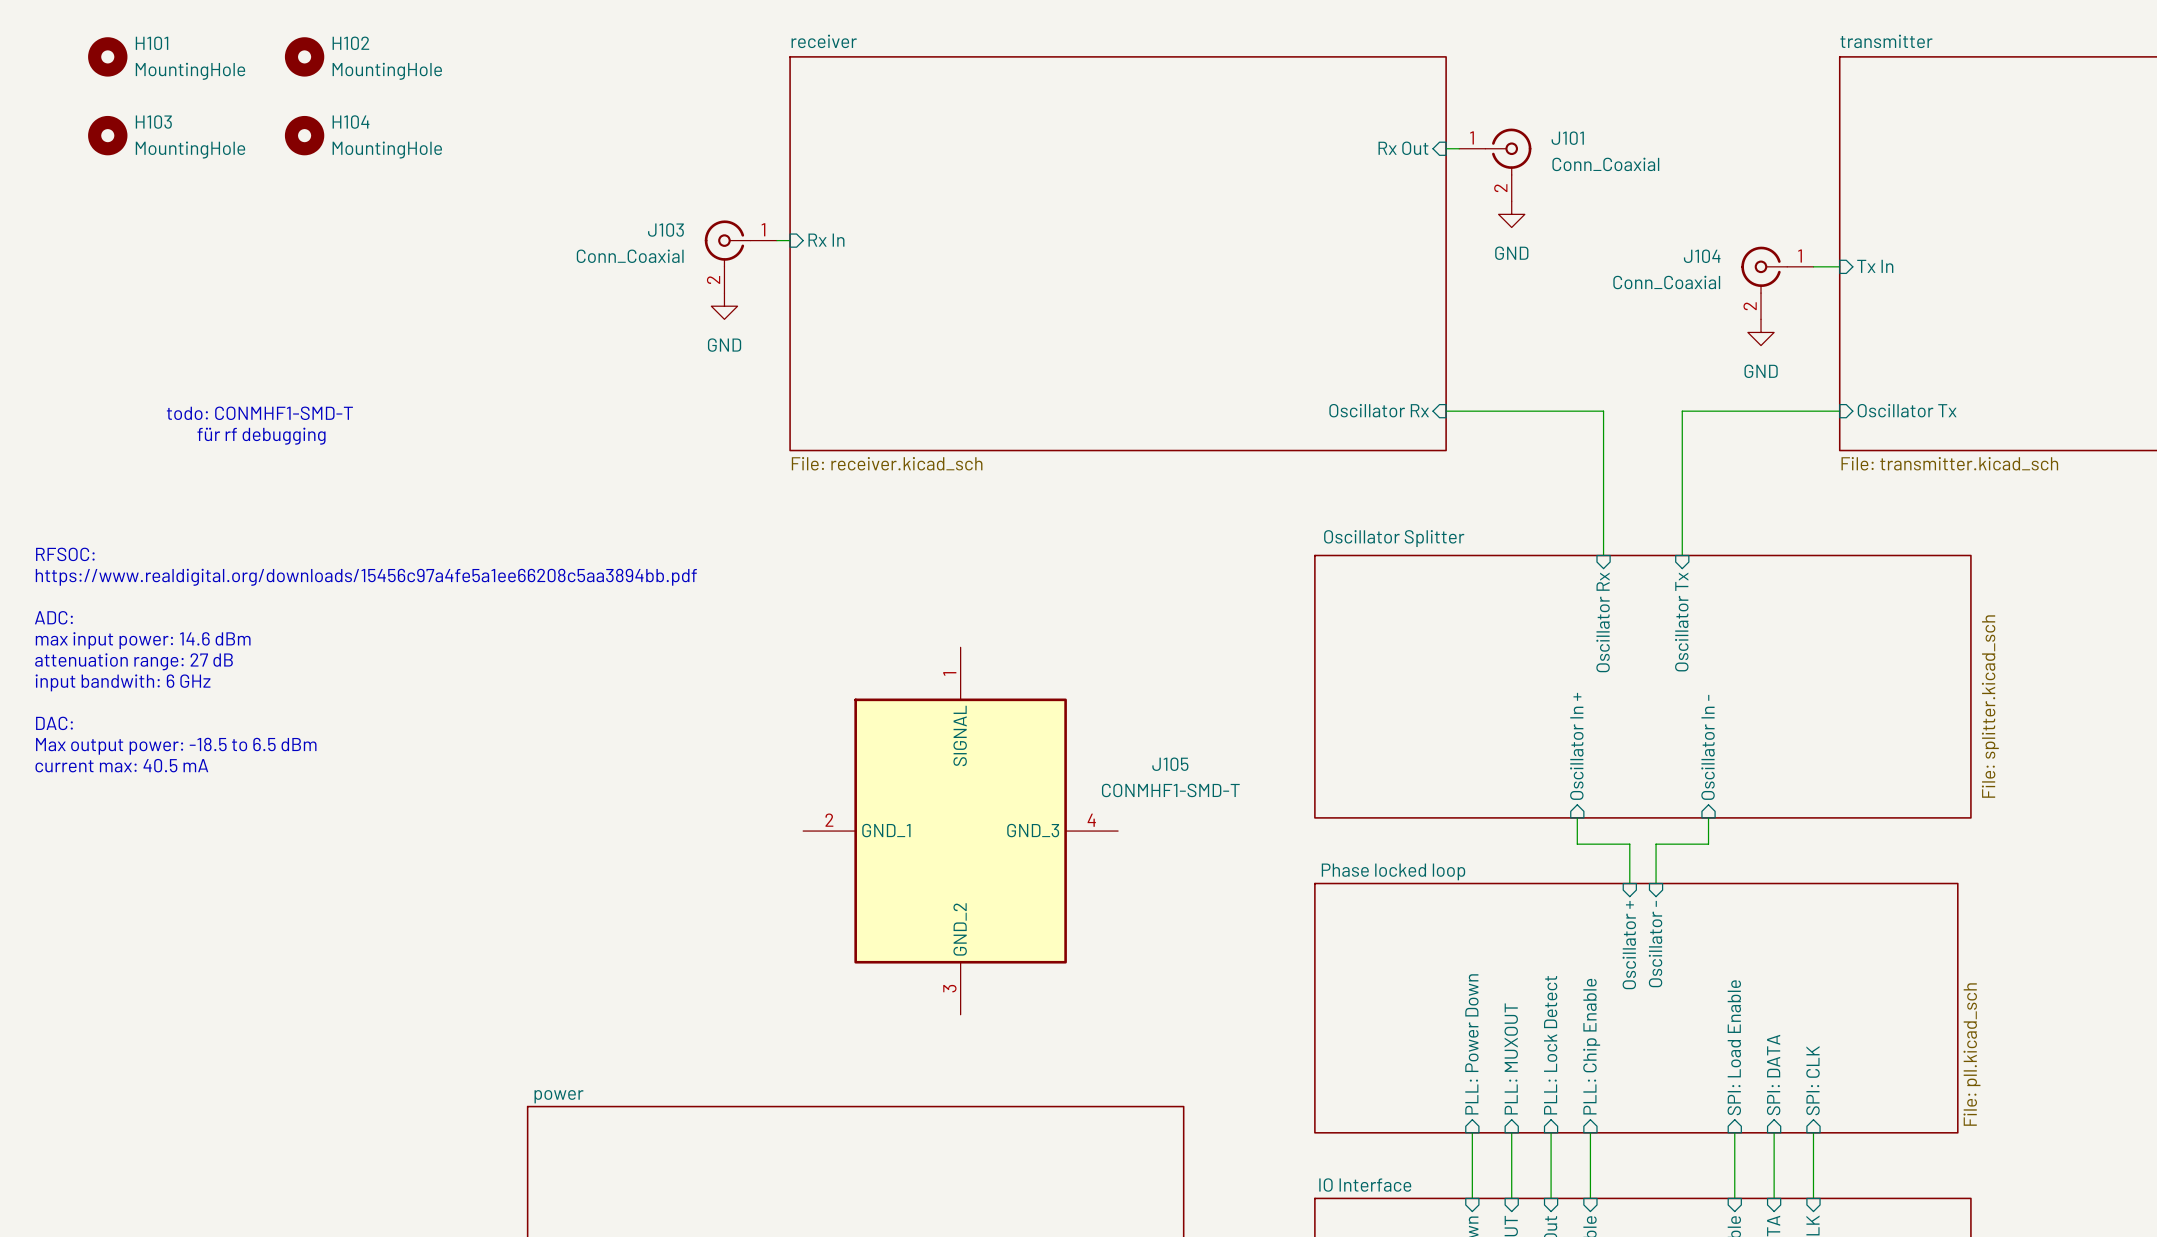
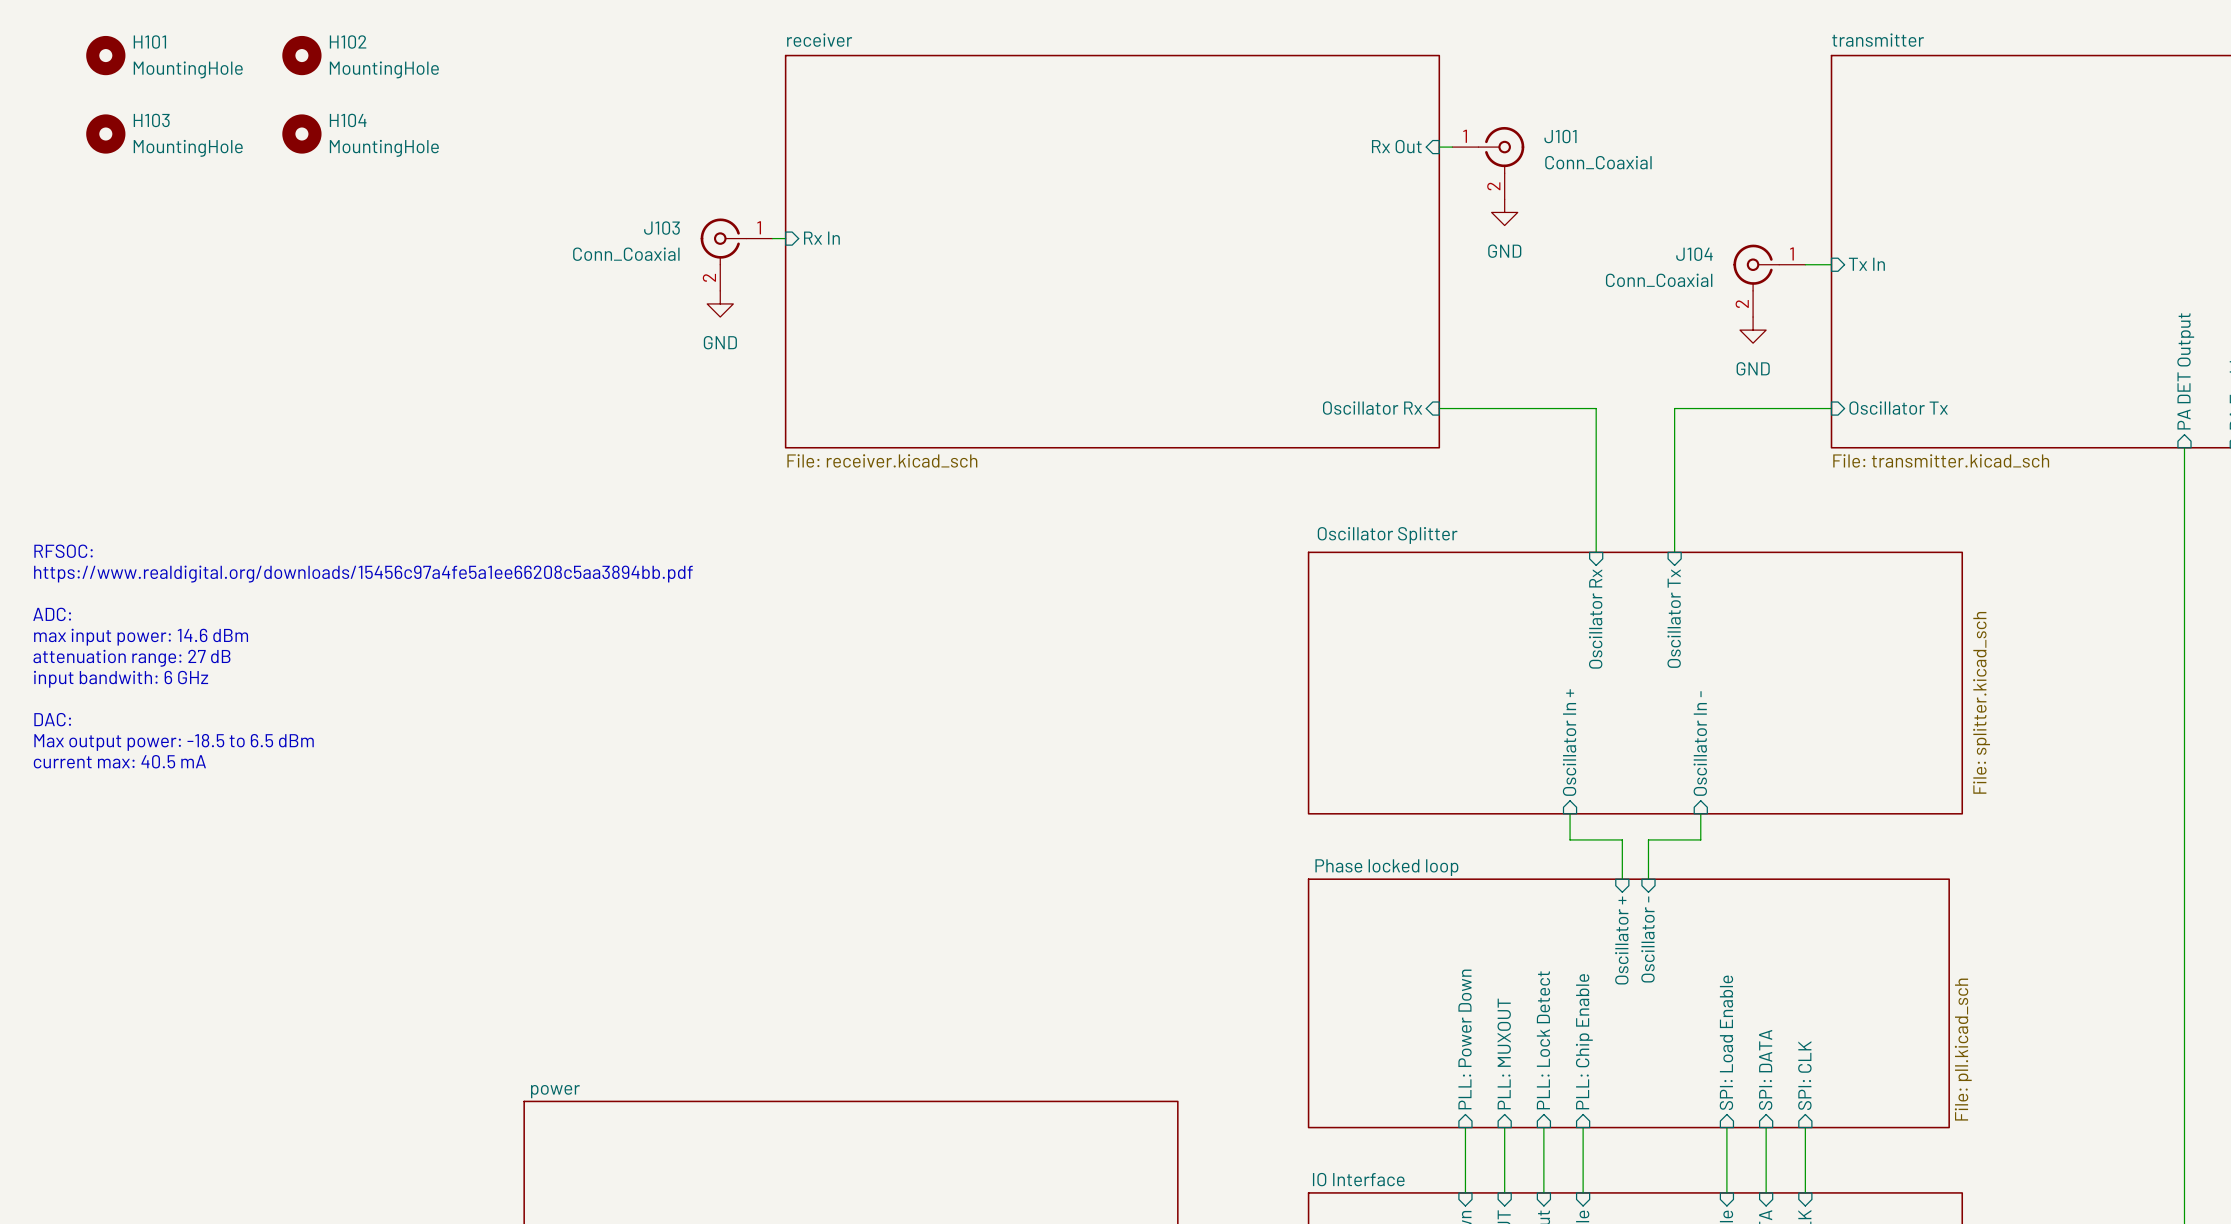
text: todo: CONMHF1-SMD-T (259, 413) -> none
text: für rf debugging (261, 436) -> none
J105: CONMHF1-SMD-T (960, 831) -> none

